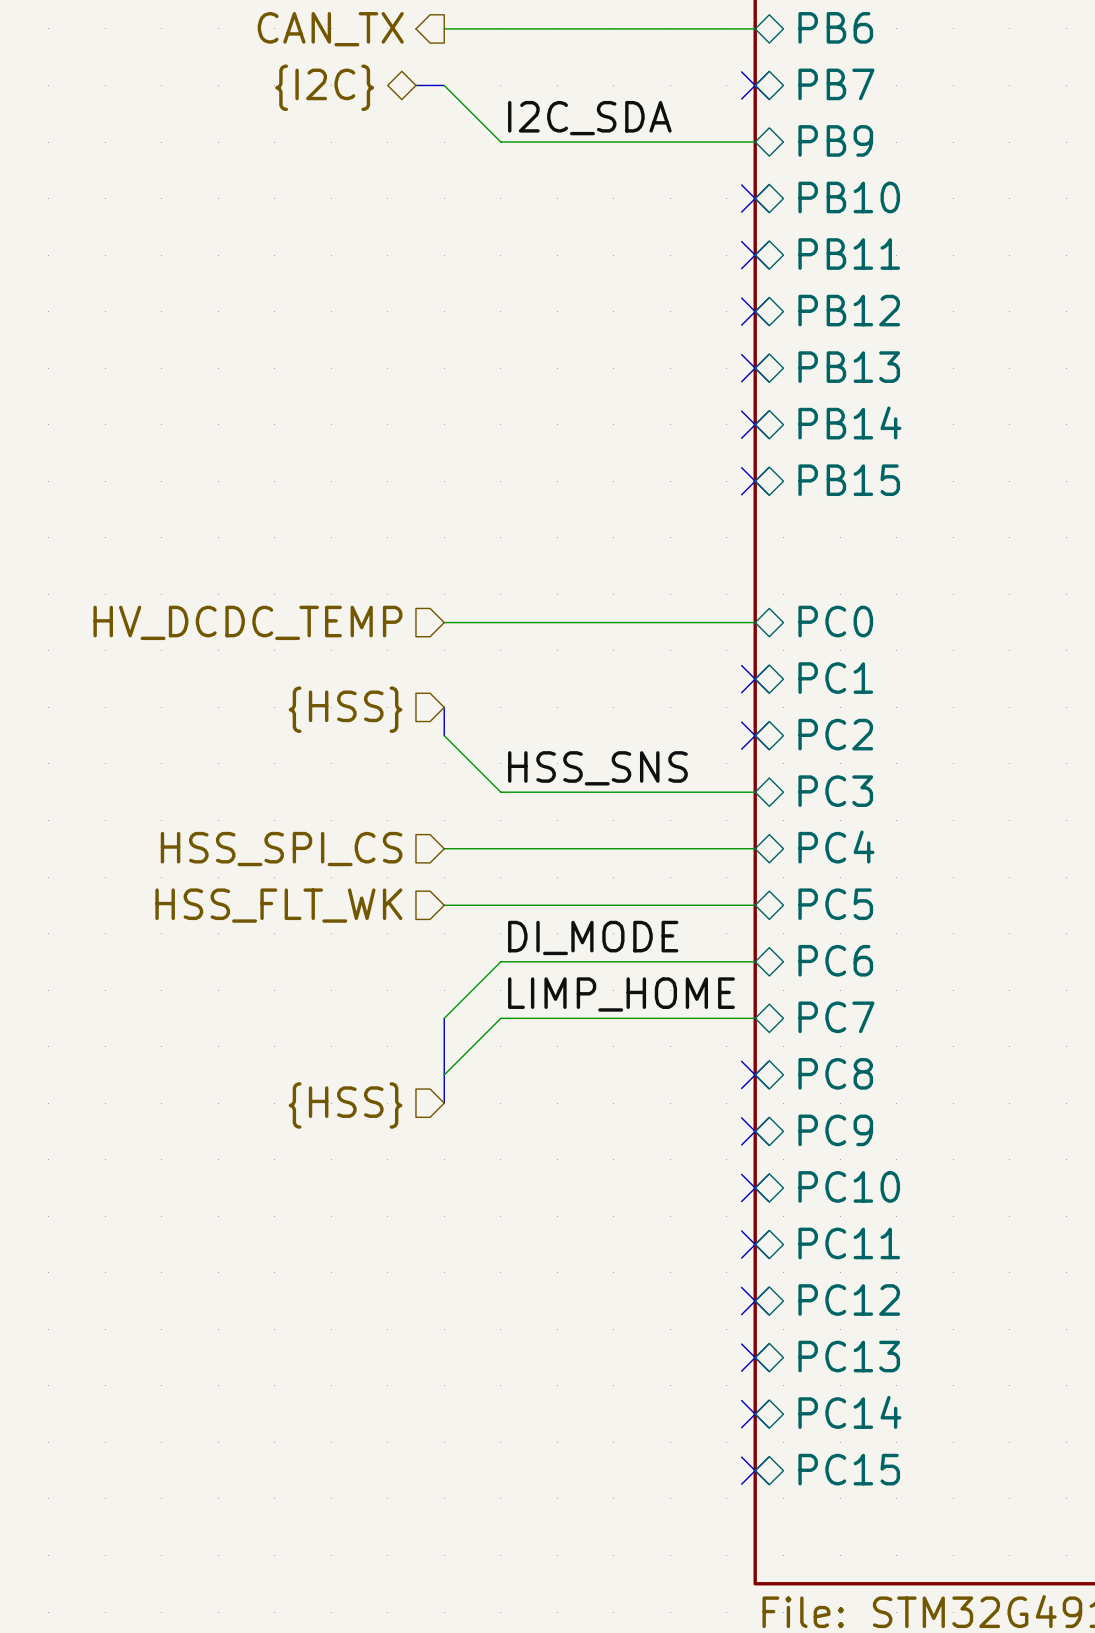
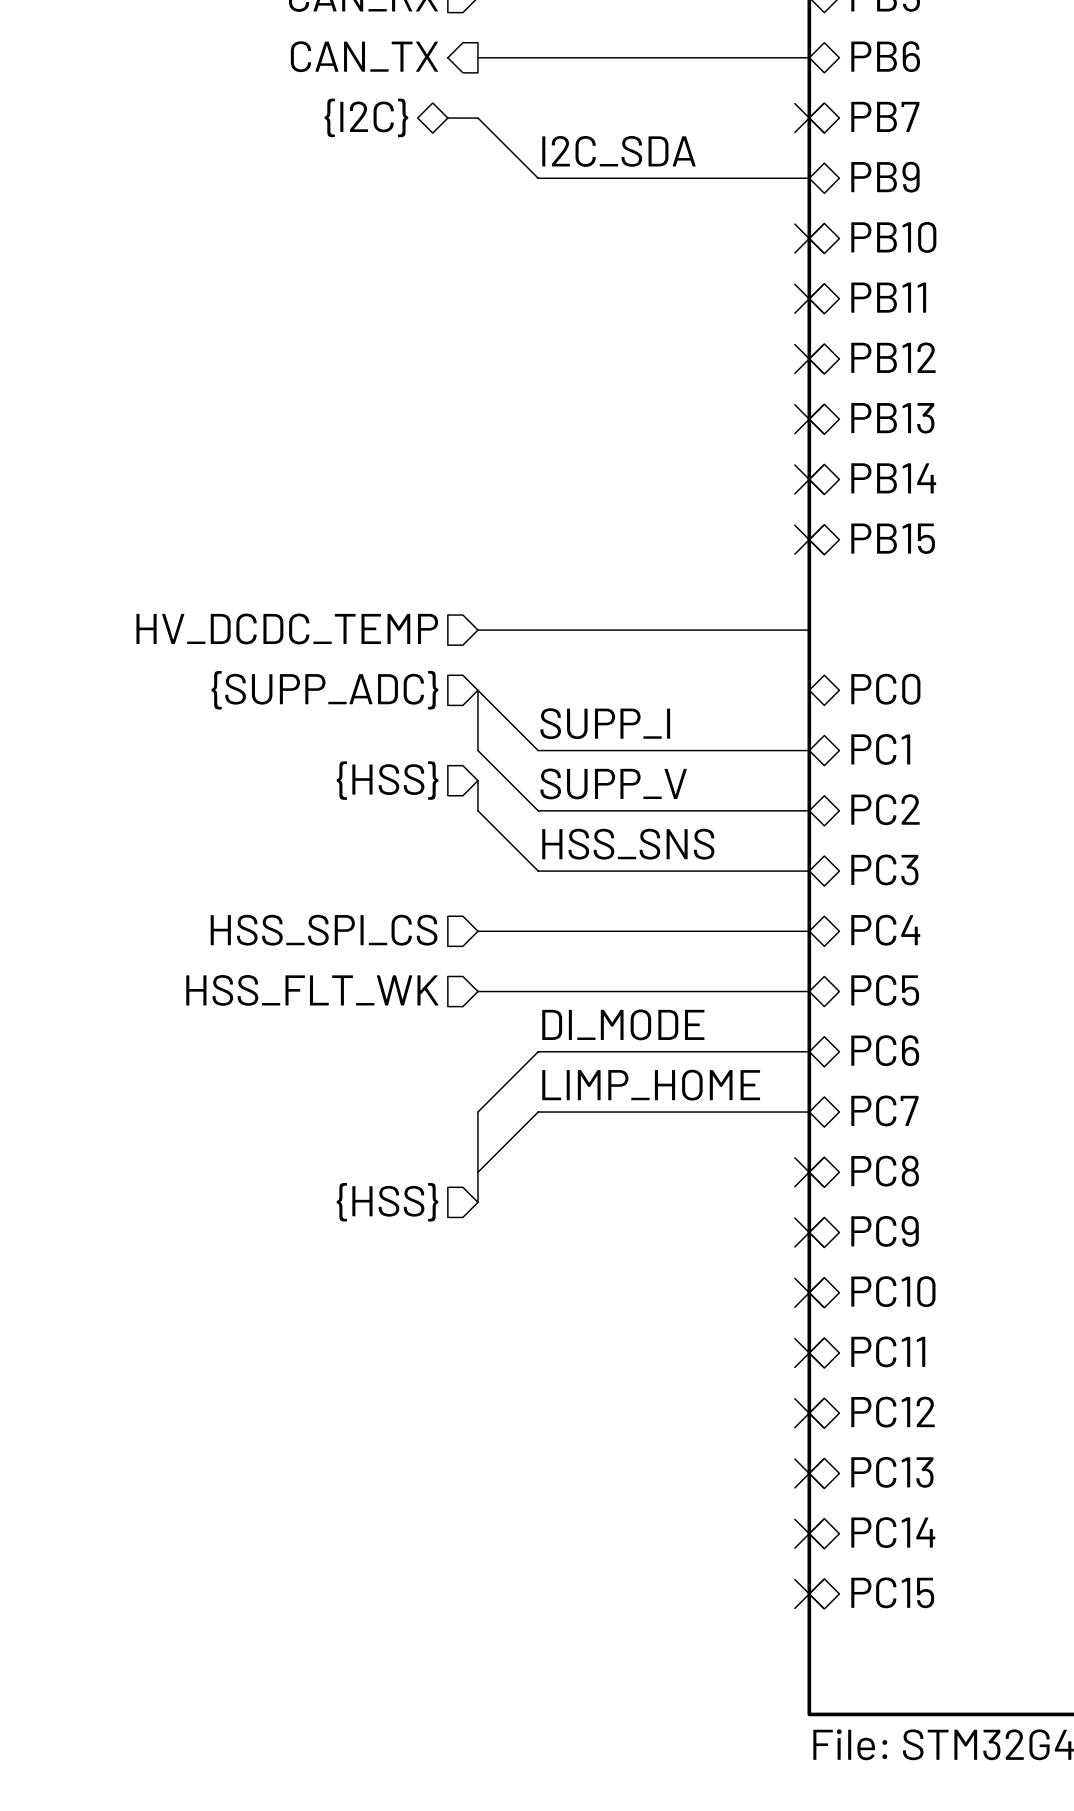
hierarchical label: none -> HV_DCDC_TEMP (287, 628)
hierarchical label: HV_DCDC_TEMP (247, 622) -> {SUPP_ADC} (324, 690)
wire: (444, 622) (755, 622) -> (477, 630) (809, 630) (809, 690)
wire: none -> (477, 690) (538, 750) (809, 750)
bus: none -> (477, 690) (477, 750)
label: none -> SUPP_I (605, 723)
wire: none -> (477, 750) (538, 810) (809, 810)
no-connect mark: (755, 679) -> none
label: none -> SUPP_V (613, 783)
no-connect mark: (755, 735) -> none

